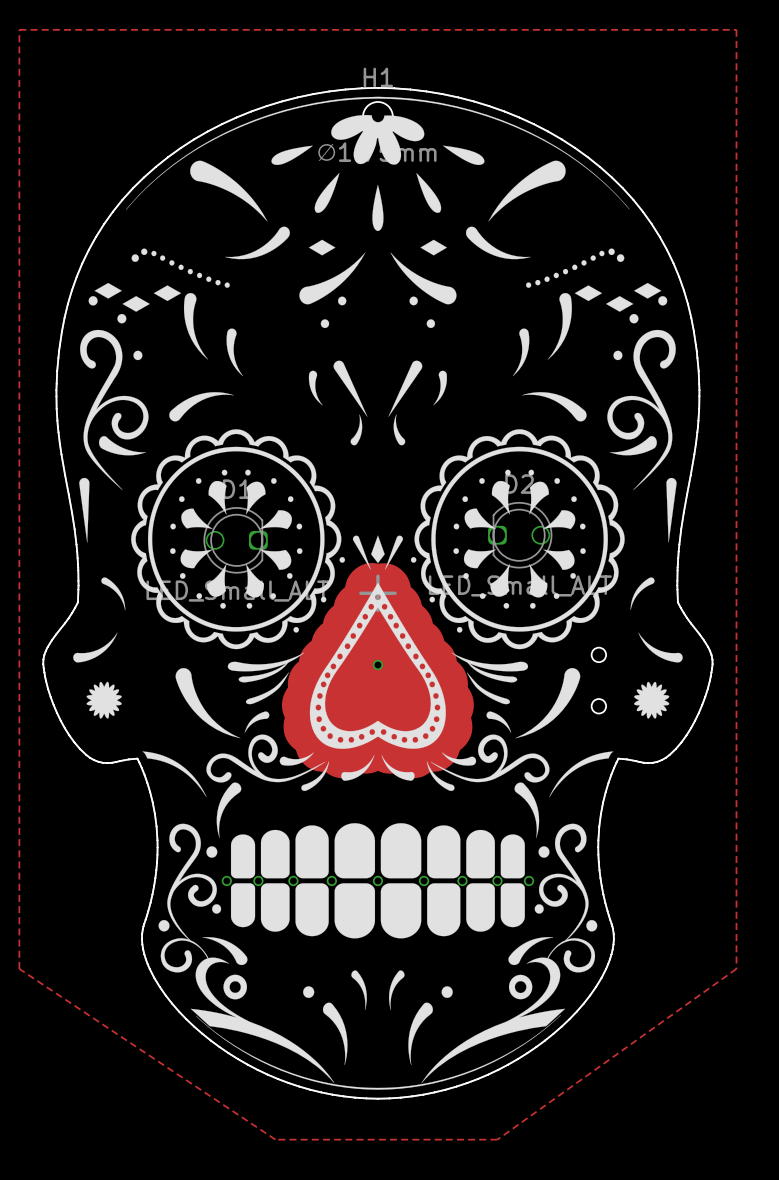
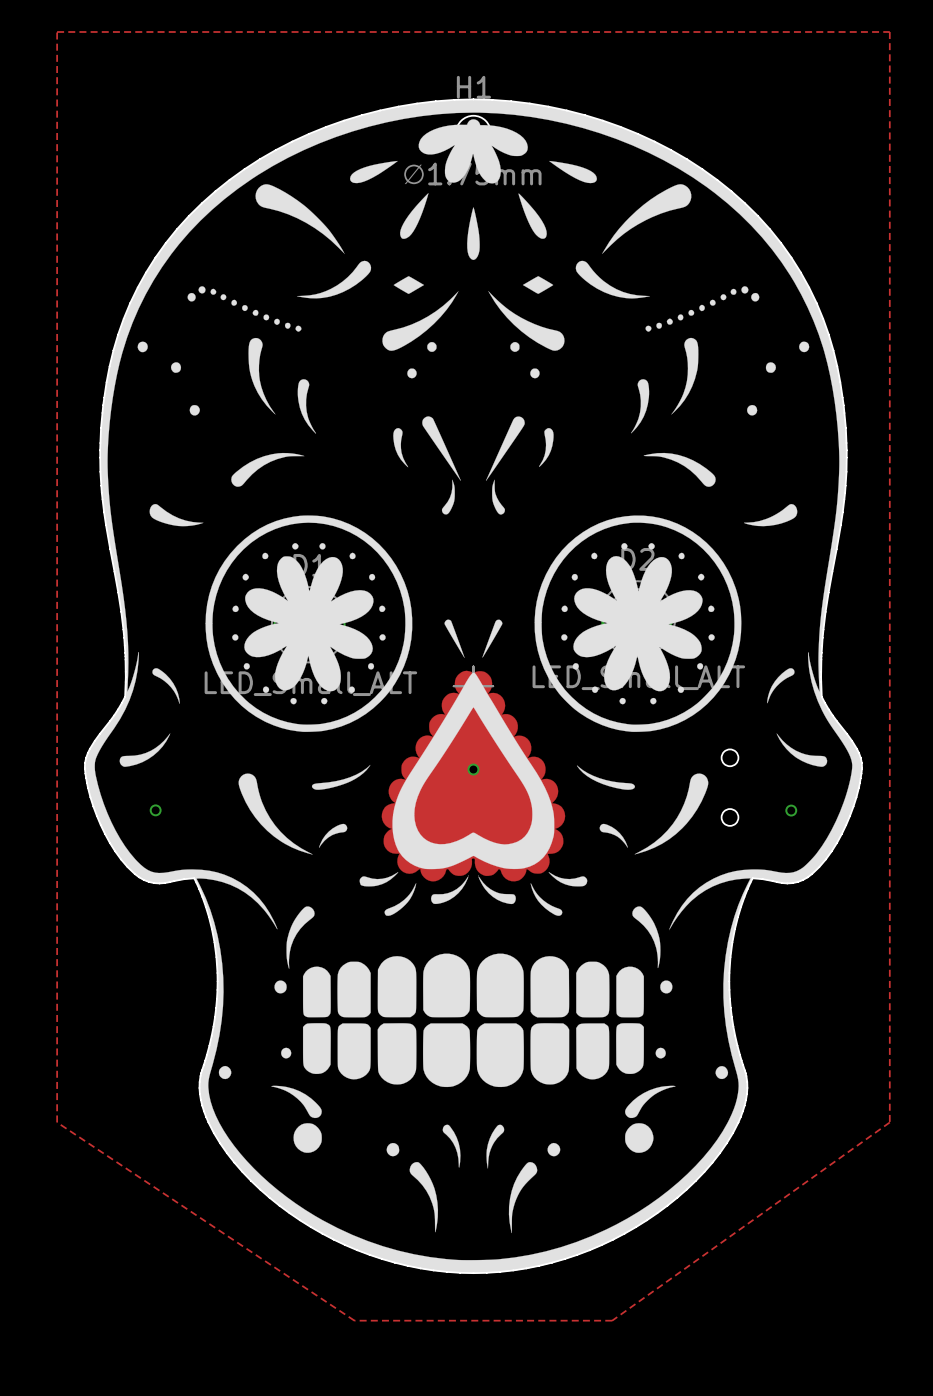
drawing: none -> [84, 99, 863, 1274]
part: (377, 593) -> none
part: none -> (473, 773)
via: (226, 880) -> none
via: (258, 880) -> none
via: (293, 880) -> none
via: (331, 880) -> none
via: (377, 880) -> none
via: (424, 880) -> none
via: (462, 880) -> none
via: (497, 880) -> none
via: (529, 880) -> none

